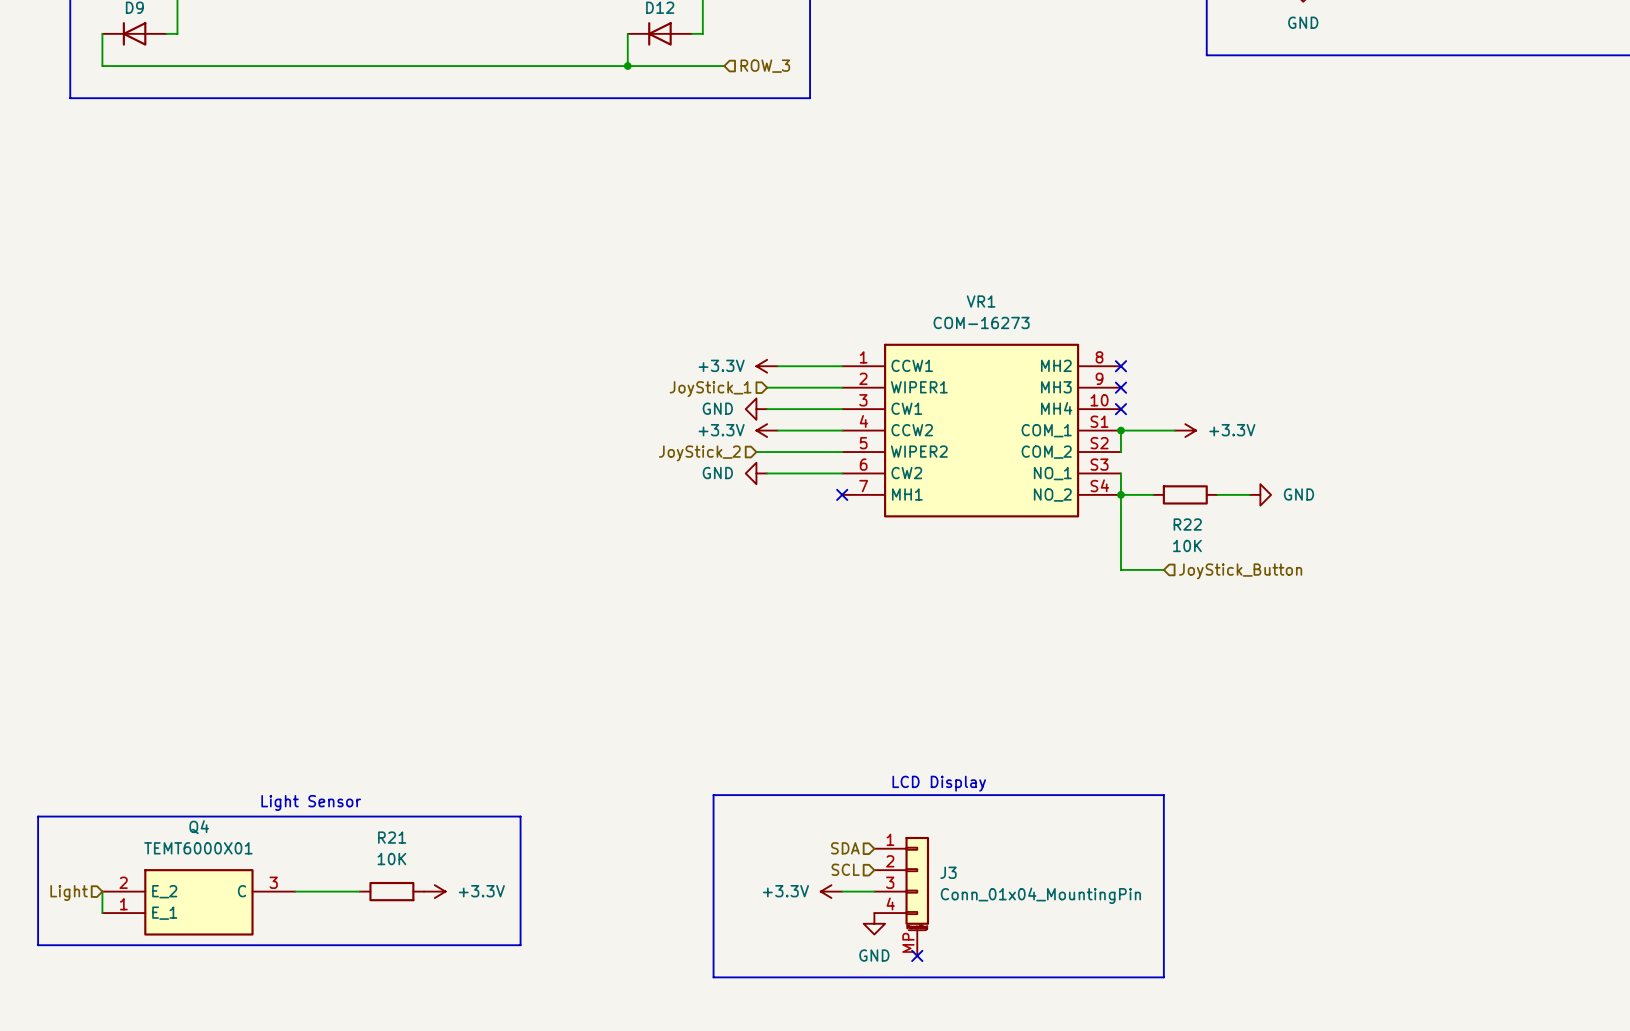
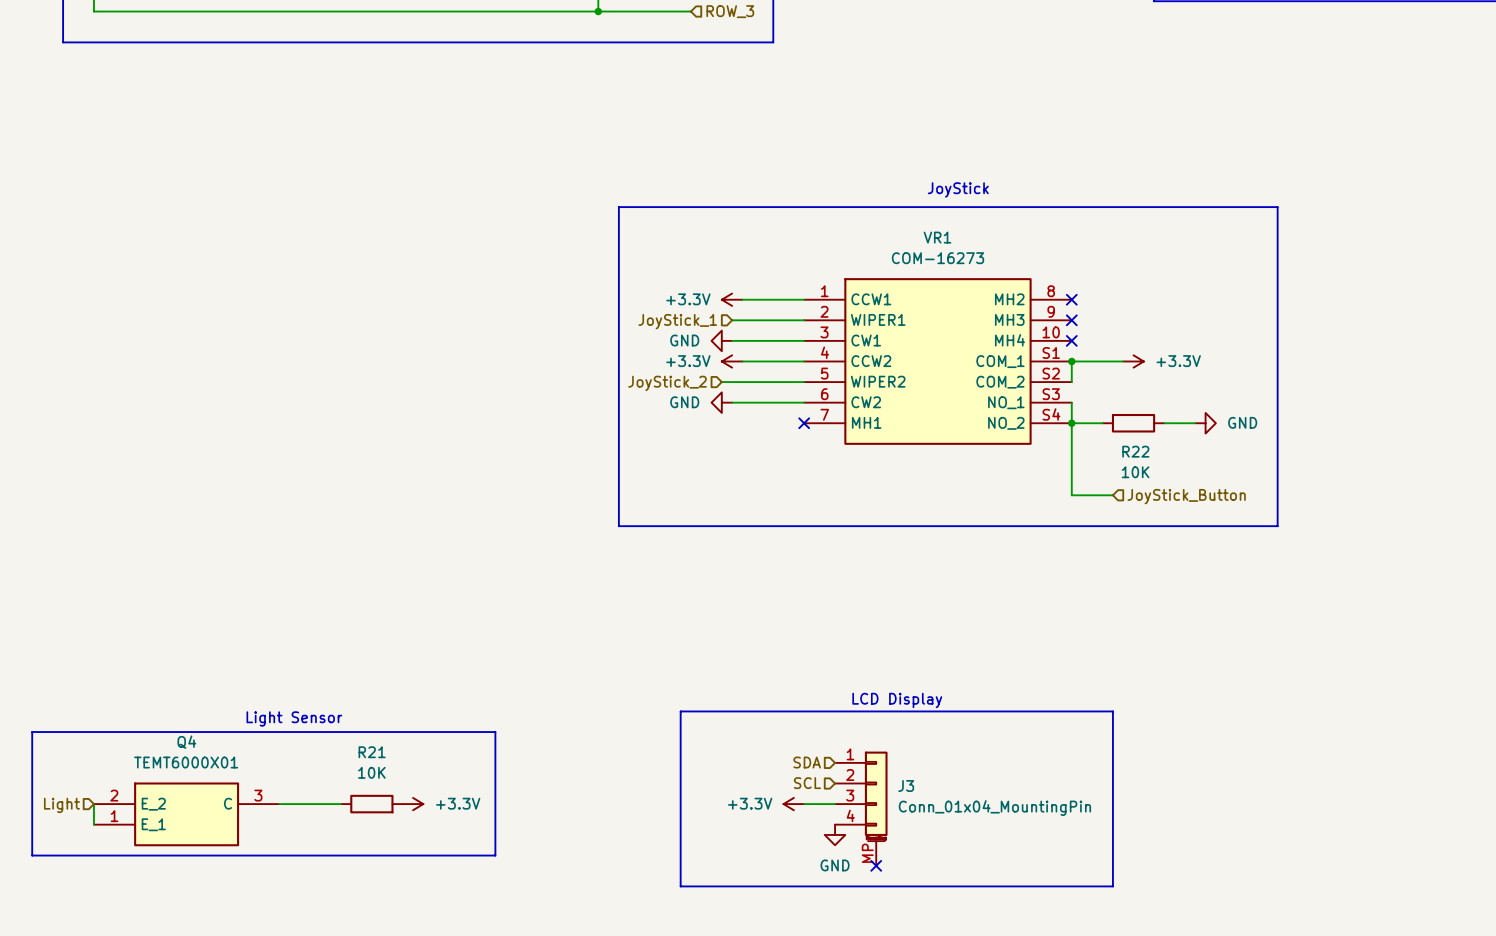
text: none -> JoyStick (958, 189)
line: none -> (618, 207) (1277, 207) (1277, 526) (618, 526) (618, 207)

